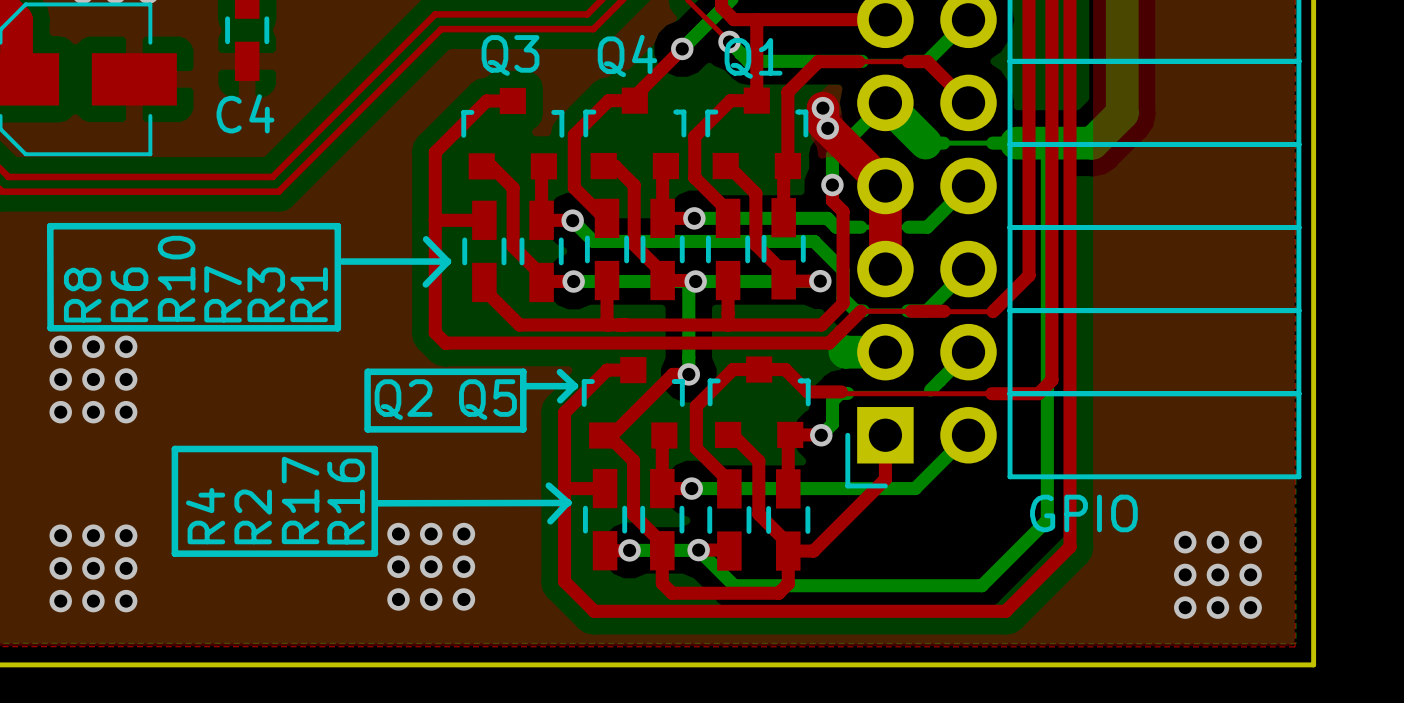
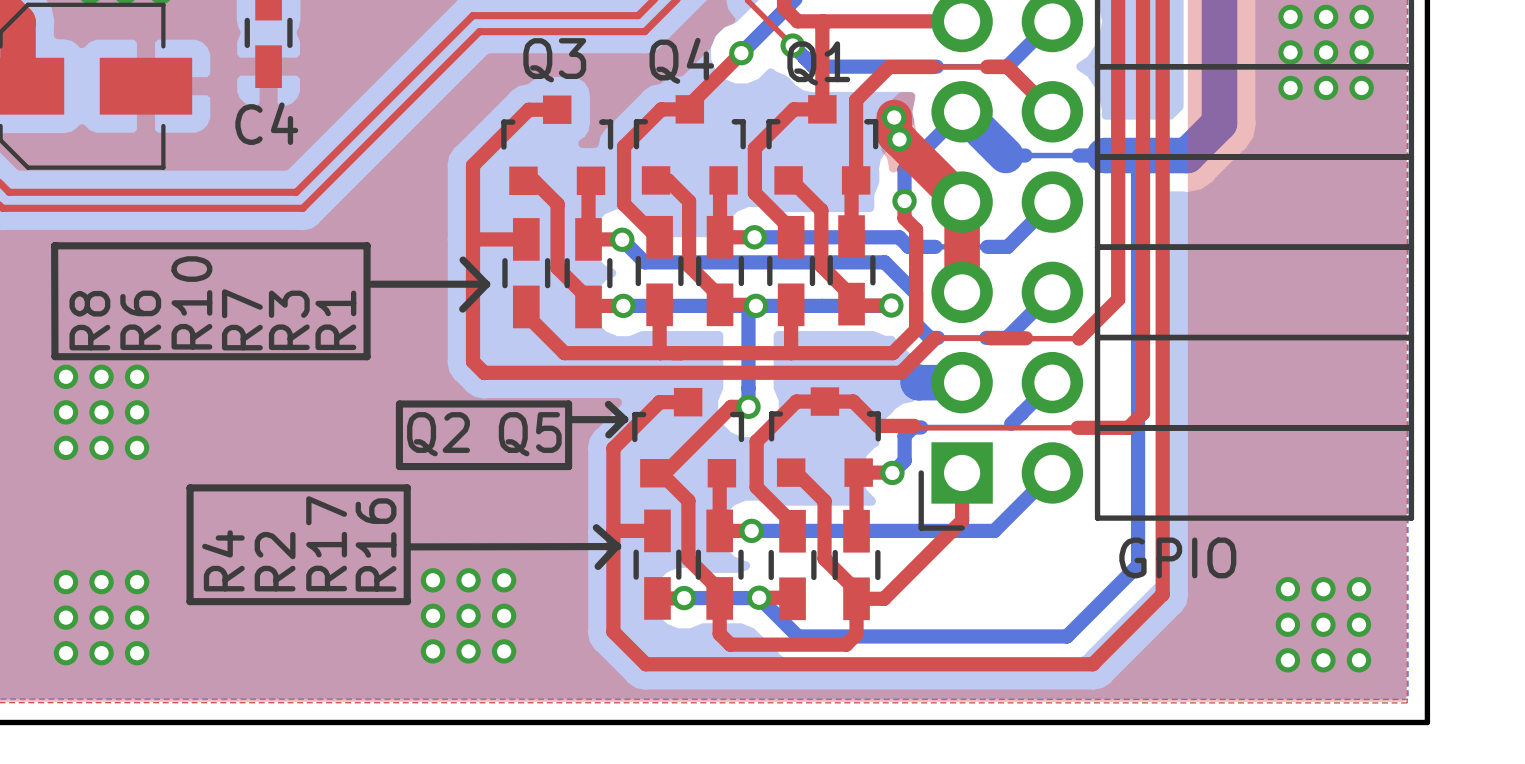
via: none -> (1290, 16)
via: none -> (1326, 16)
via: none -> (1361, 16)
via: none -> (1290, 52)
via: none -> (1326, 52)
via: none -> (1361, 52)
via: none -> (1290, 87)
via: none -> (1326, 87)
via: none -> (1361, 87)

